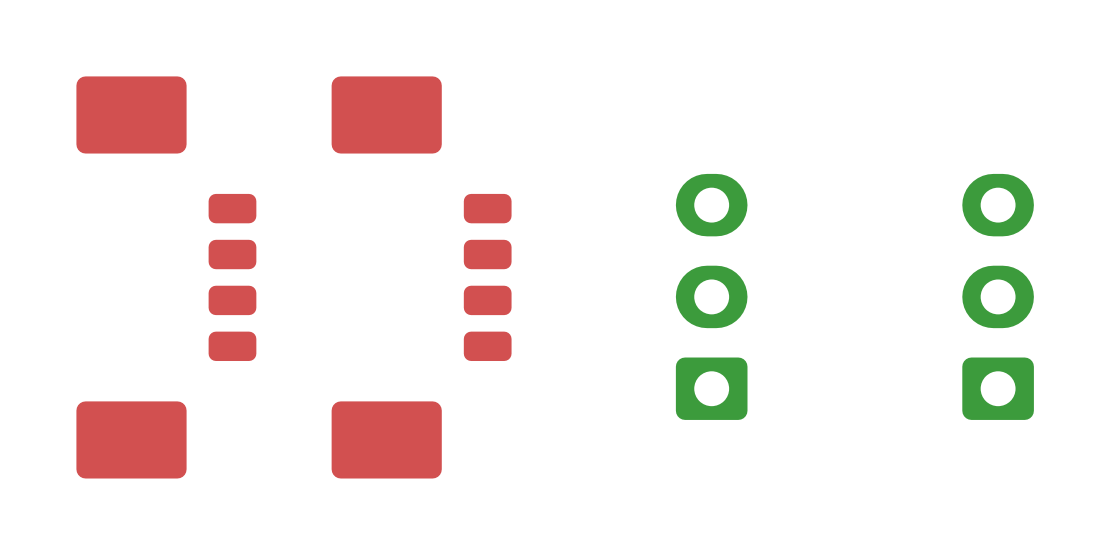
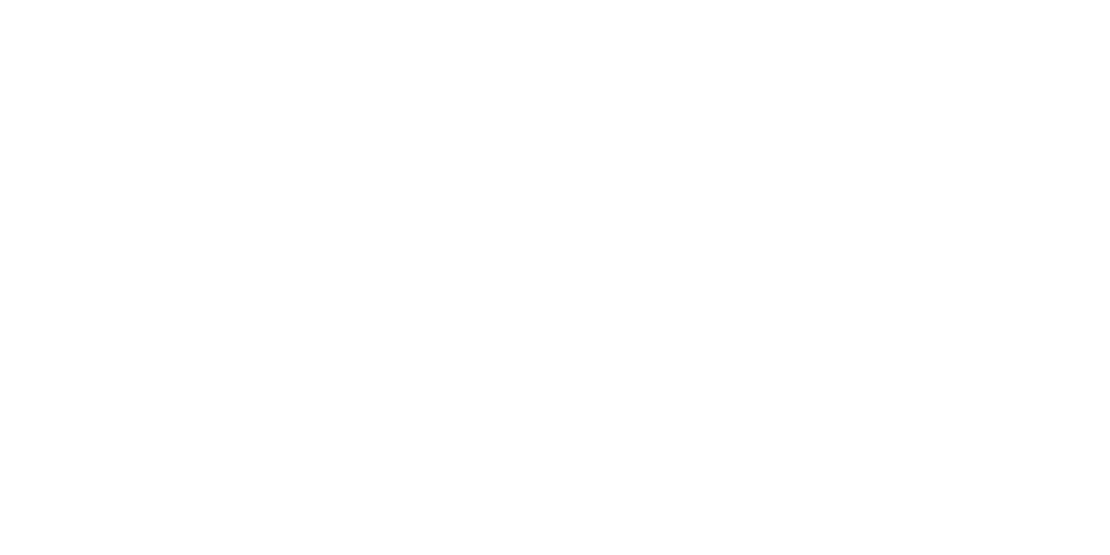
part: (166, 277) -> none
part: (421, 277) -> none
part: (711, 296) -> none
part: (998, 296) -> none

